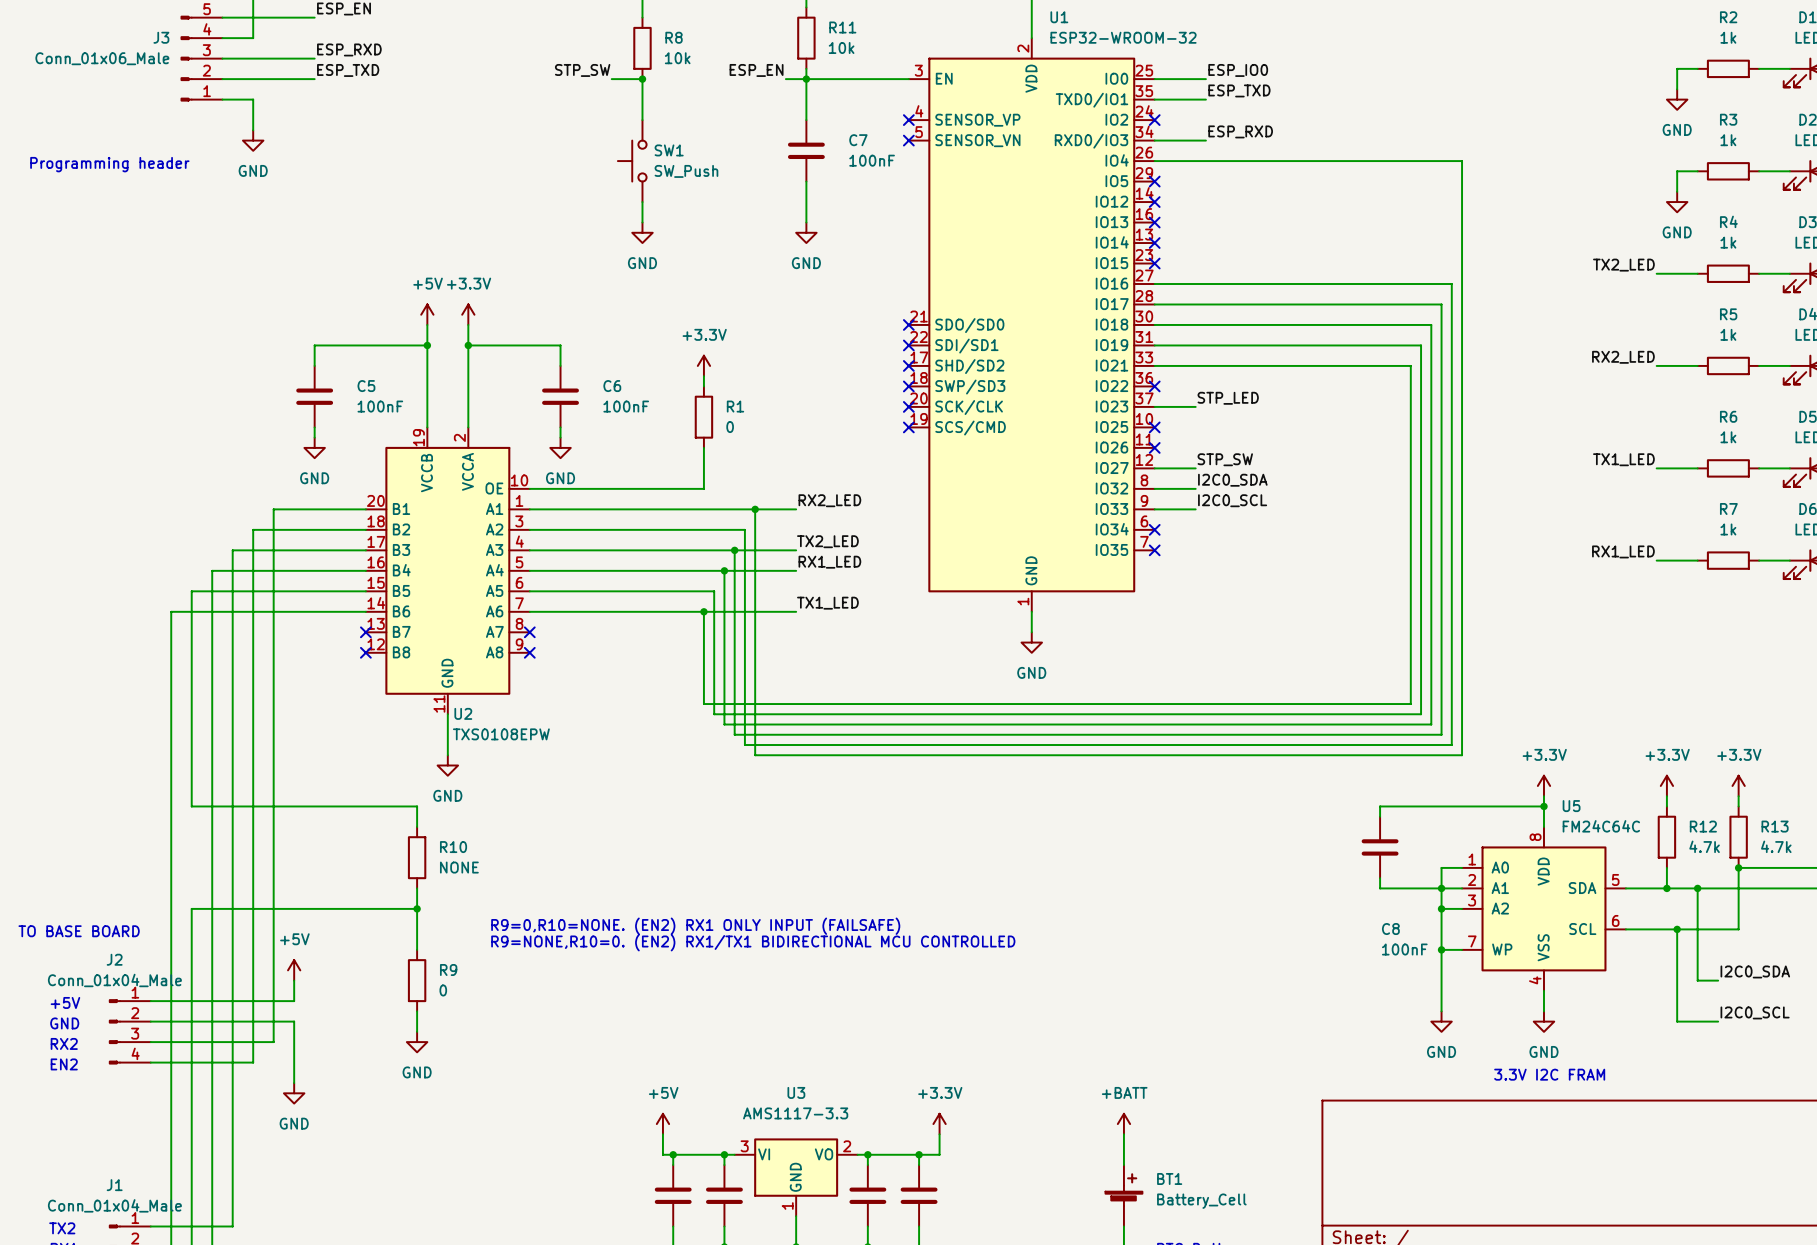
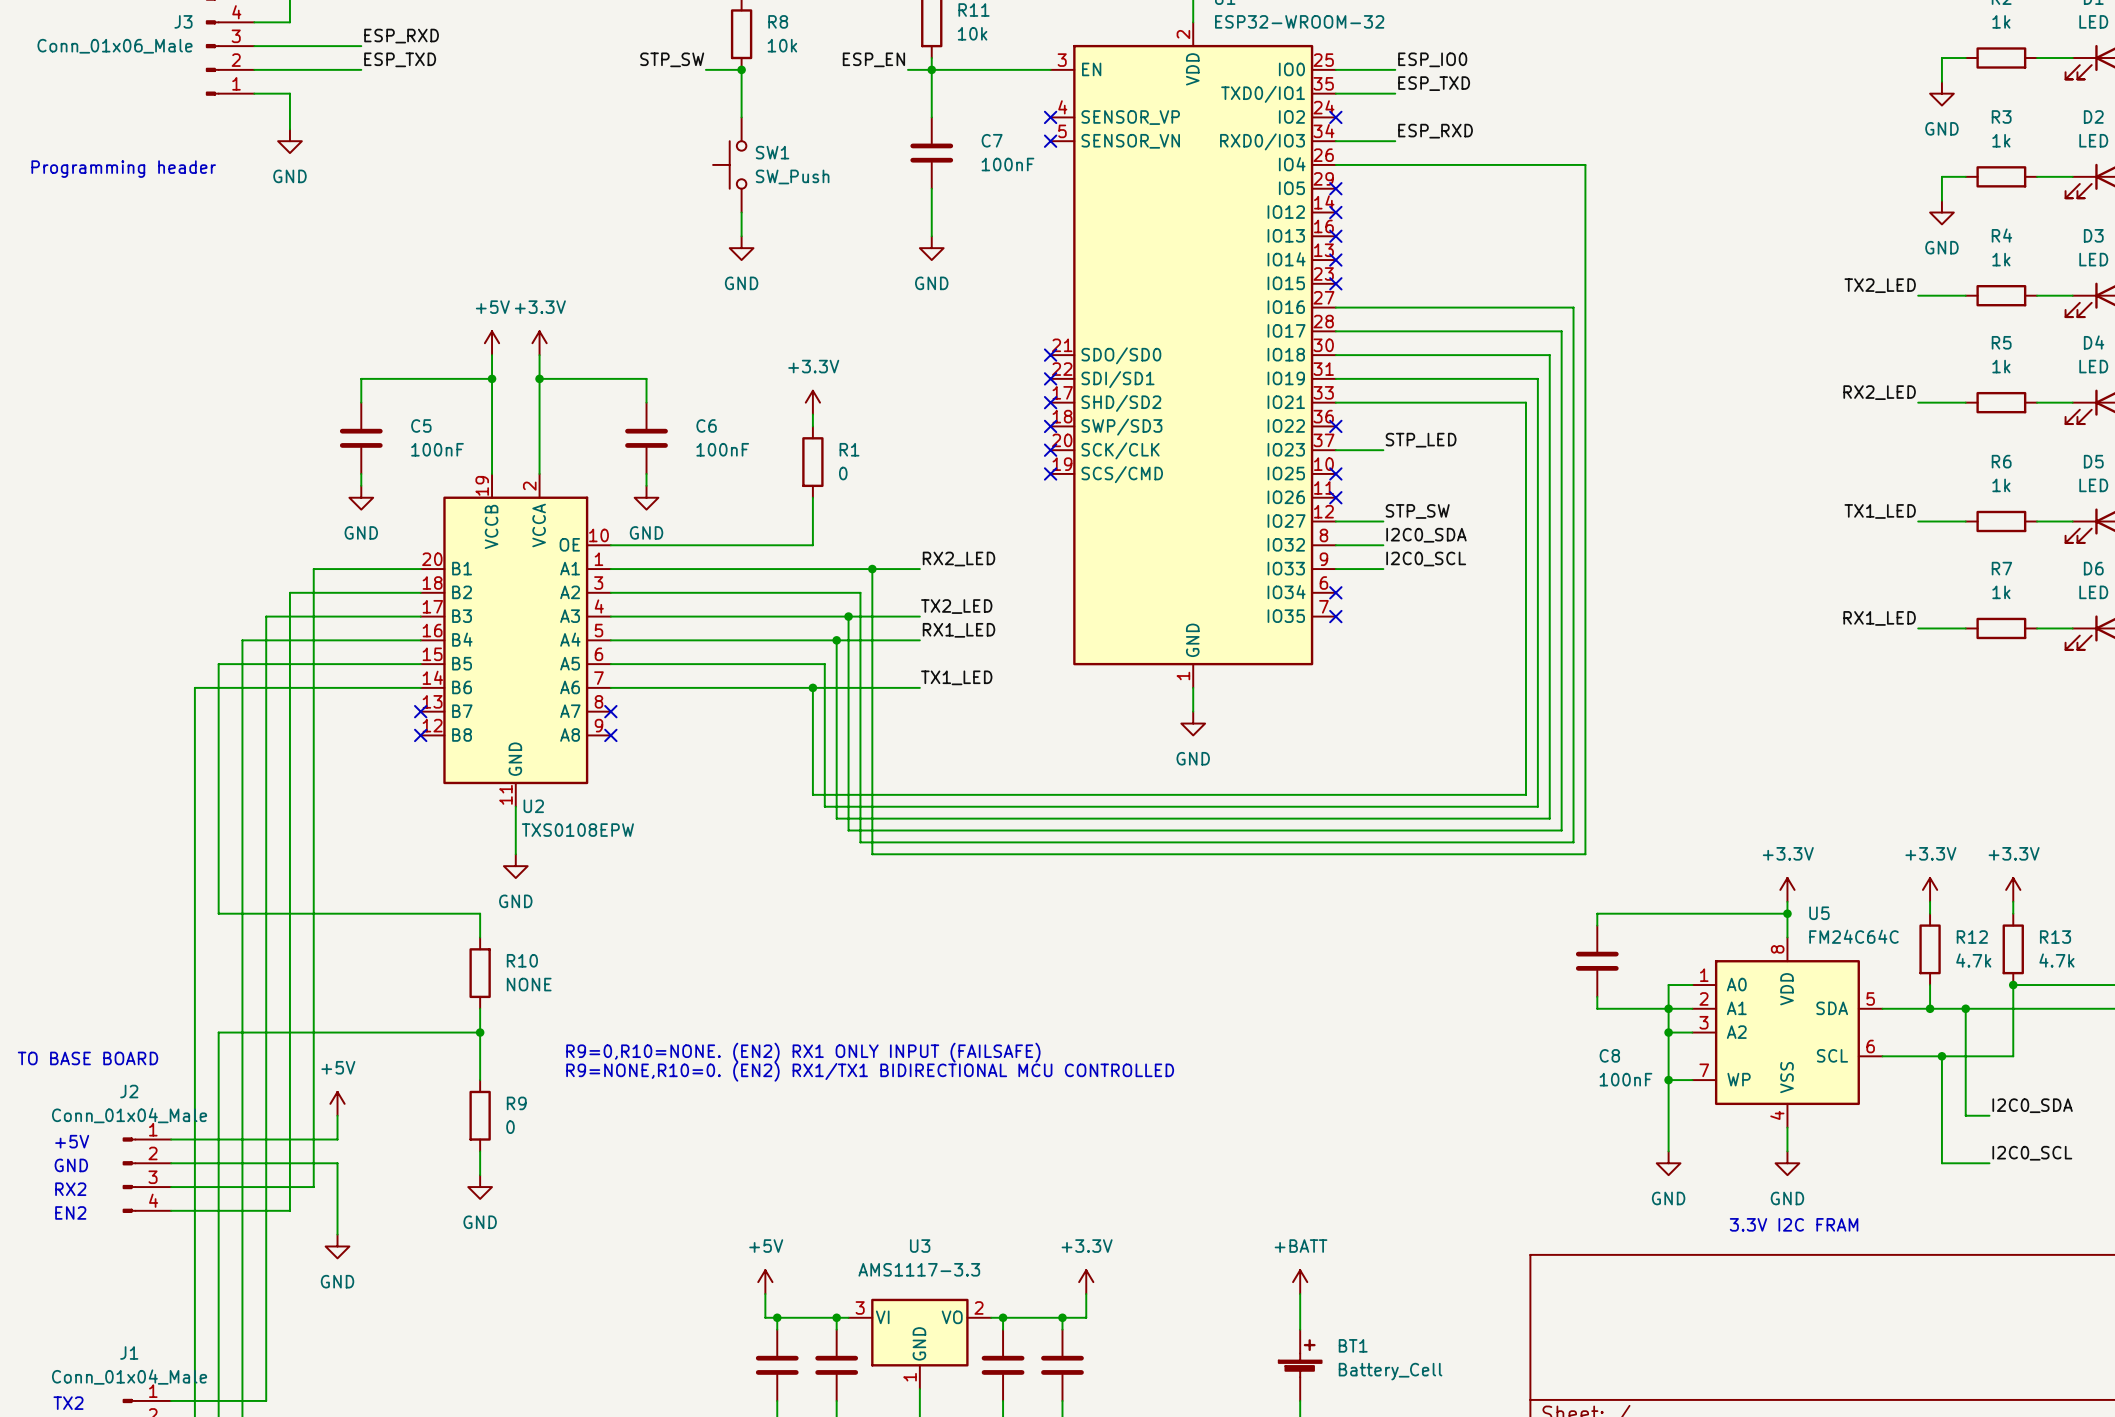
wire: (1369, 161) (1462, 161) (1462, 755) (1369, 755) -> (1585, 164) (1585, 854)
wire: (1359, 284) (1451, 284) (1451, 745) (1359, 745) -> (1573, 307) (1573, 842)
wire: (1349, 304) (1441, 304) (1441, 734) (1349, 734) -> (1561, 331) (1561, 830)
wire: (1339, 324) (1431, 324) (1431, 724) (1339, 724) -> (1549, 355) (1549, 818)
wire: (1328, 345) (1421, 345) (1421, 714) (1328, 714) -> (1537, 378) (1537, 806)
wire: (1318, 365) (1410, 365) (1410, 704) (1318, 704) -> (1525, 402) (1525, 794)

